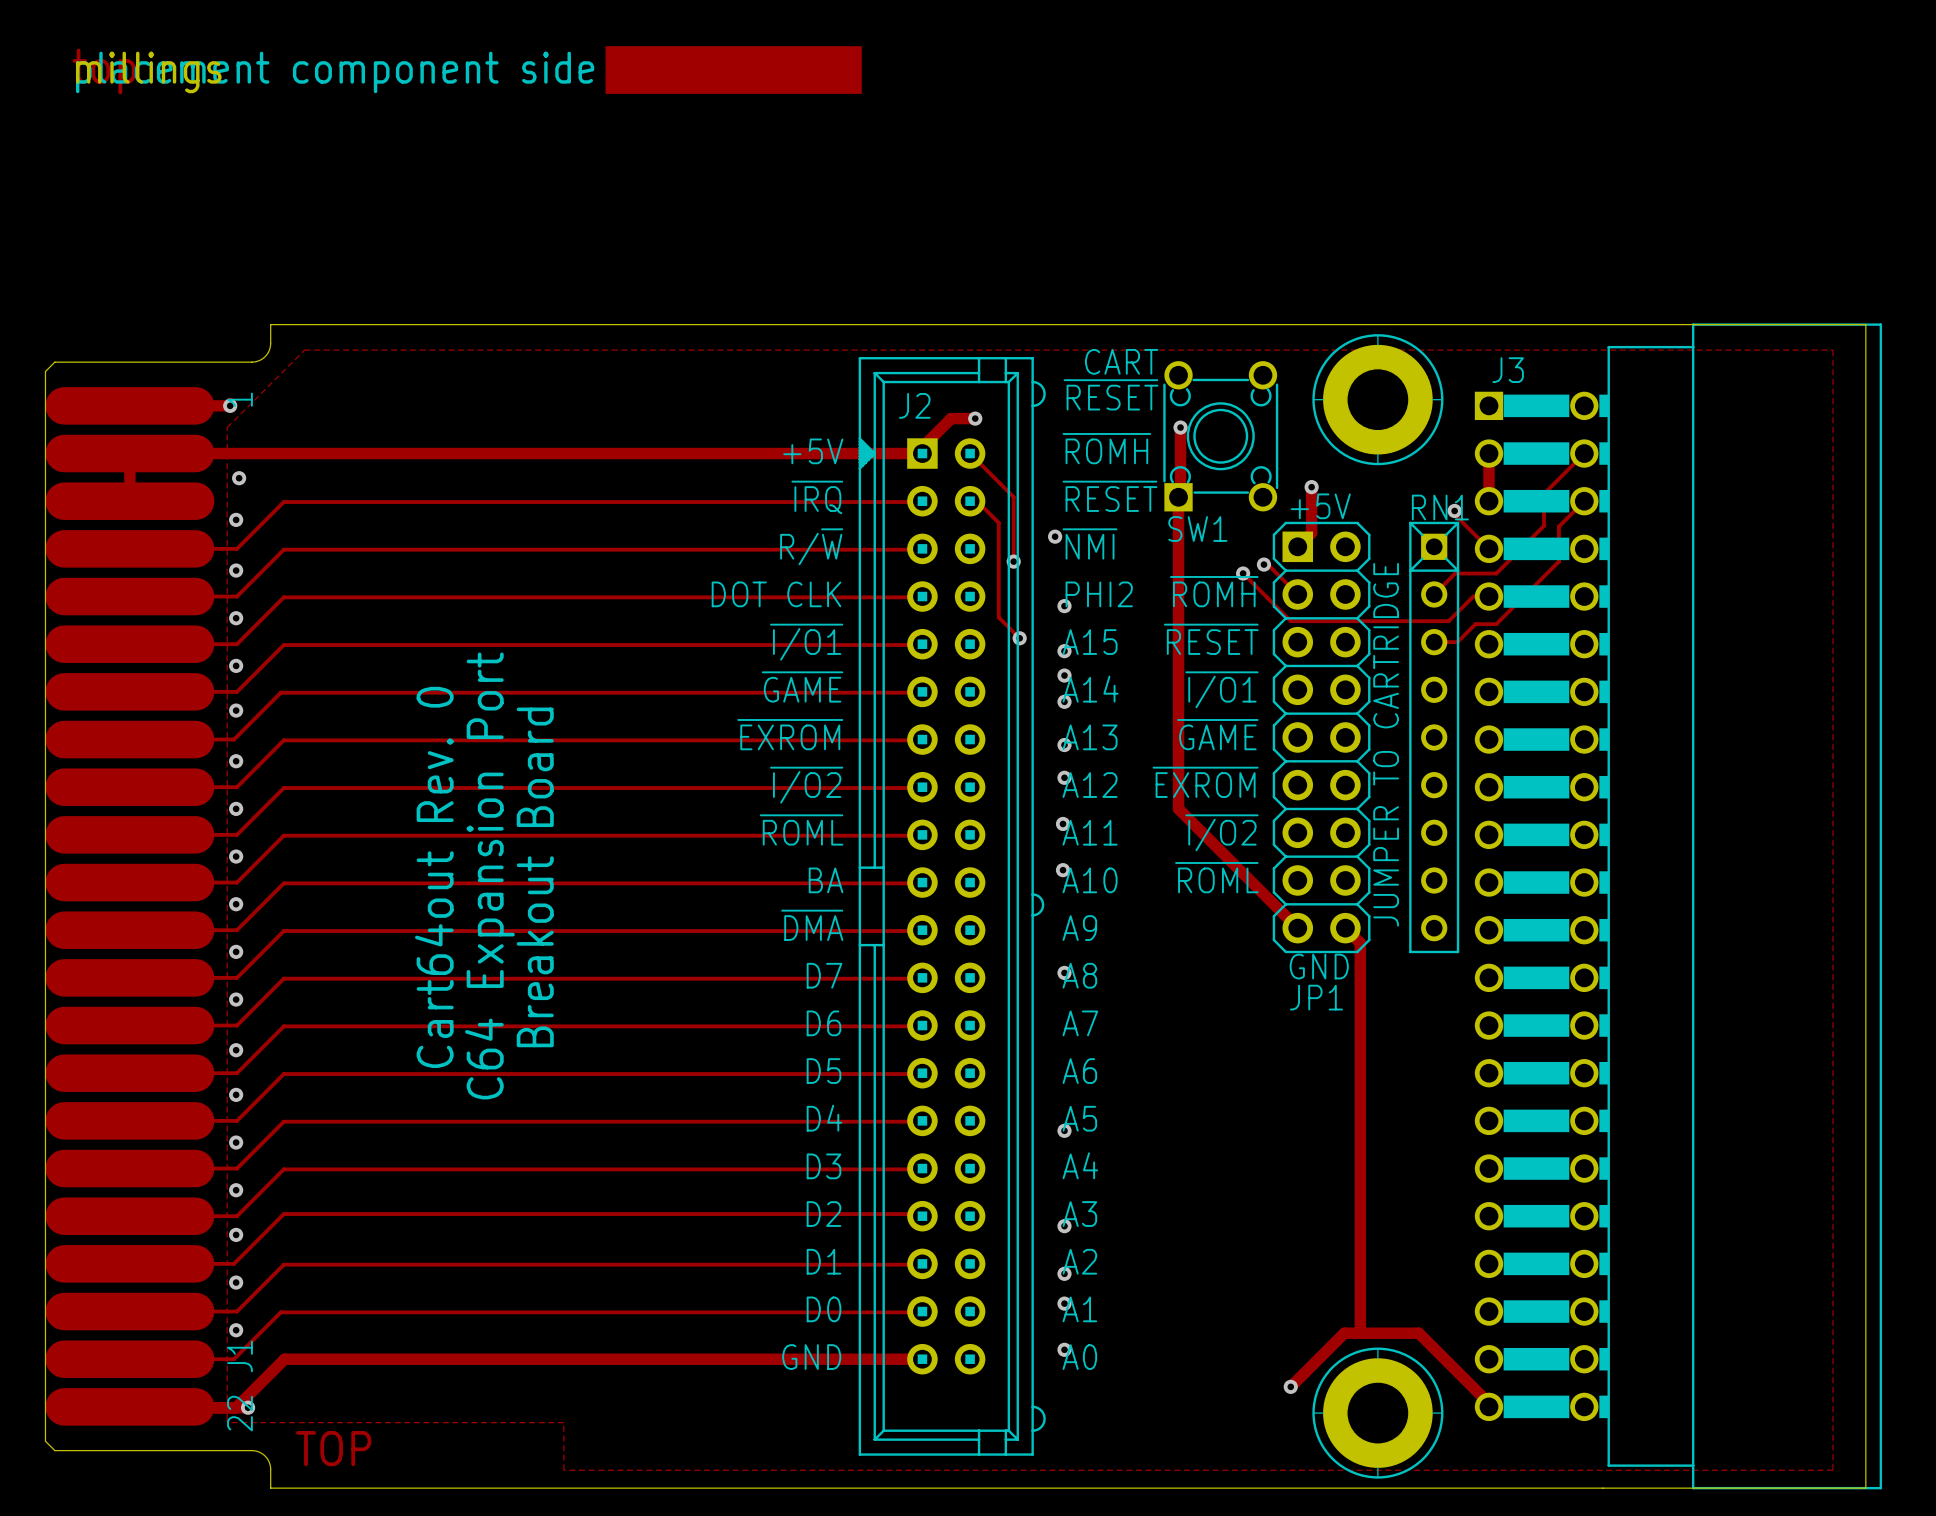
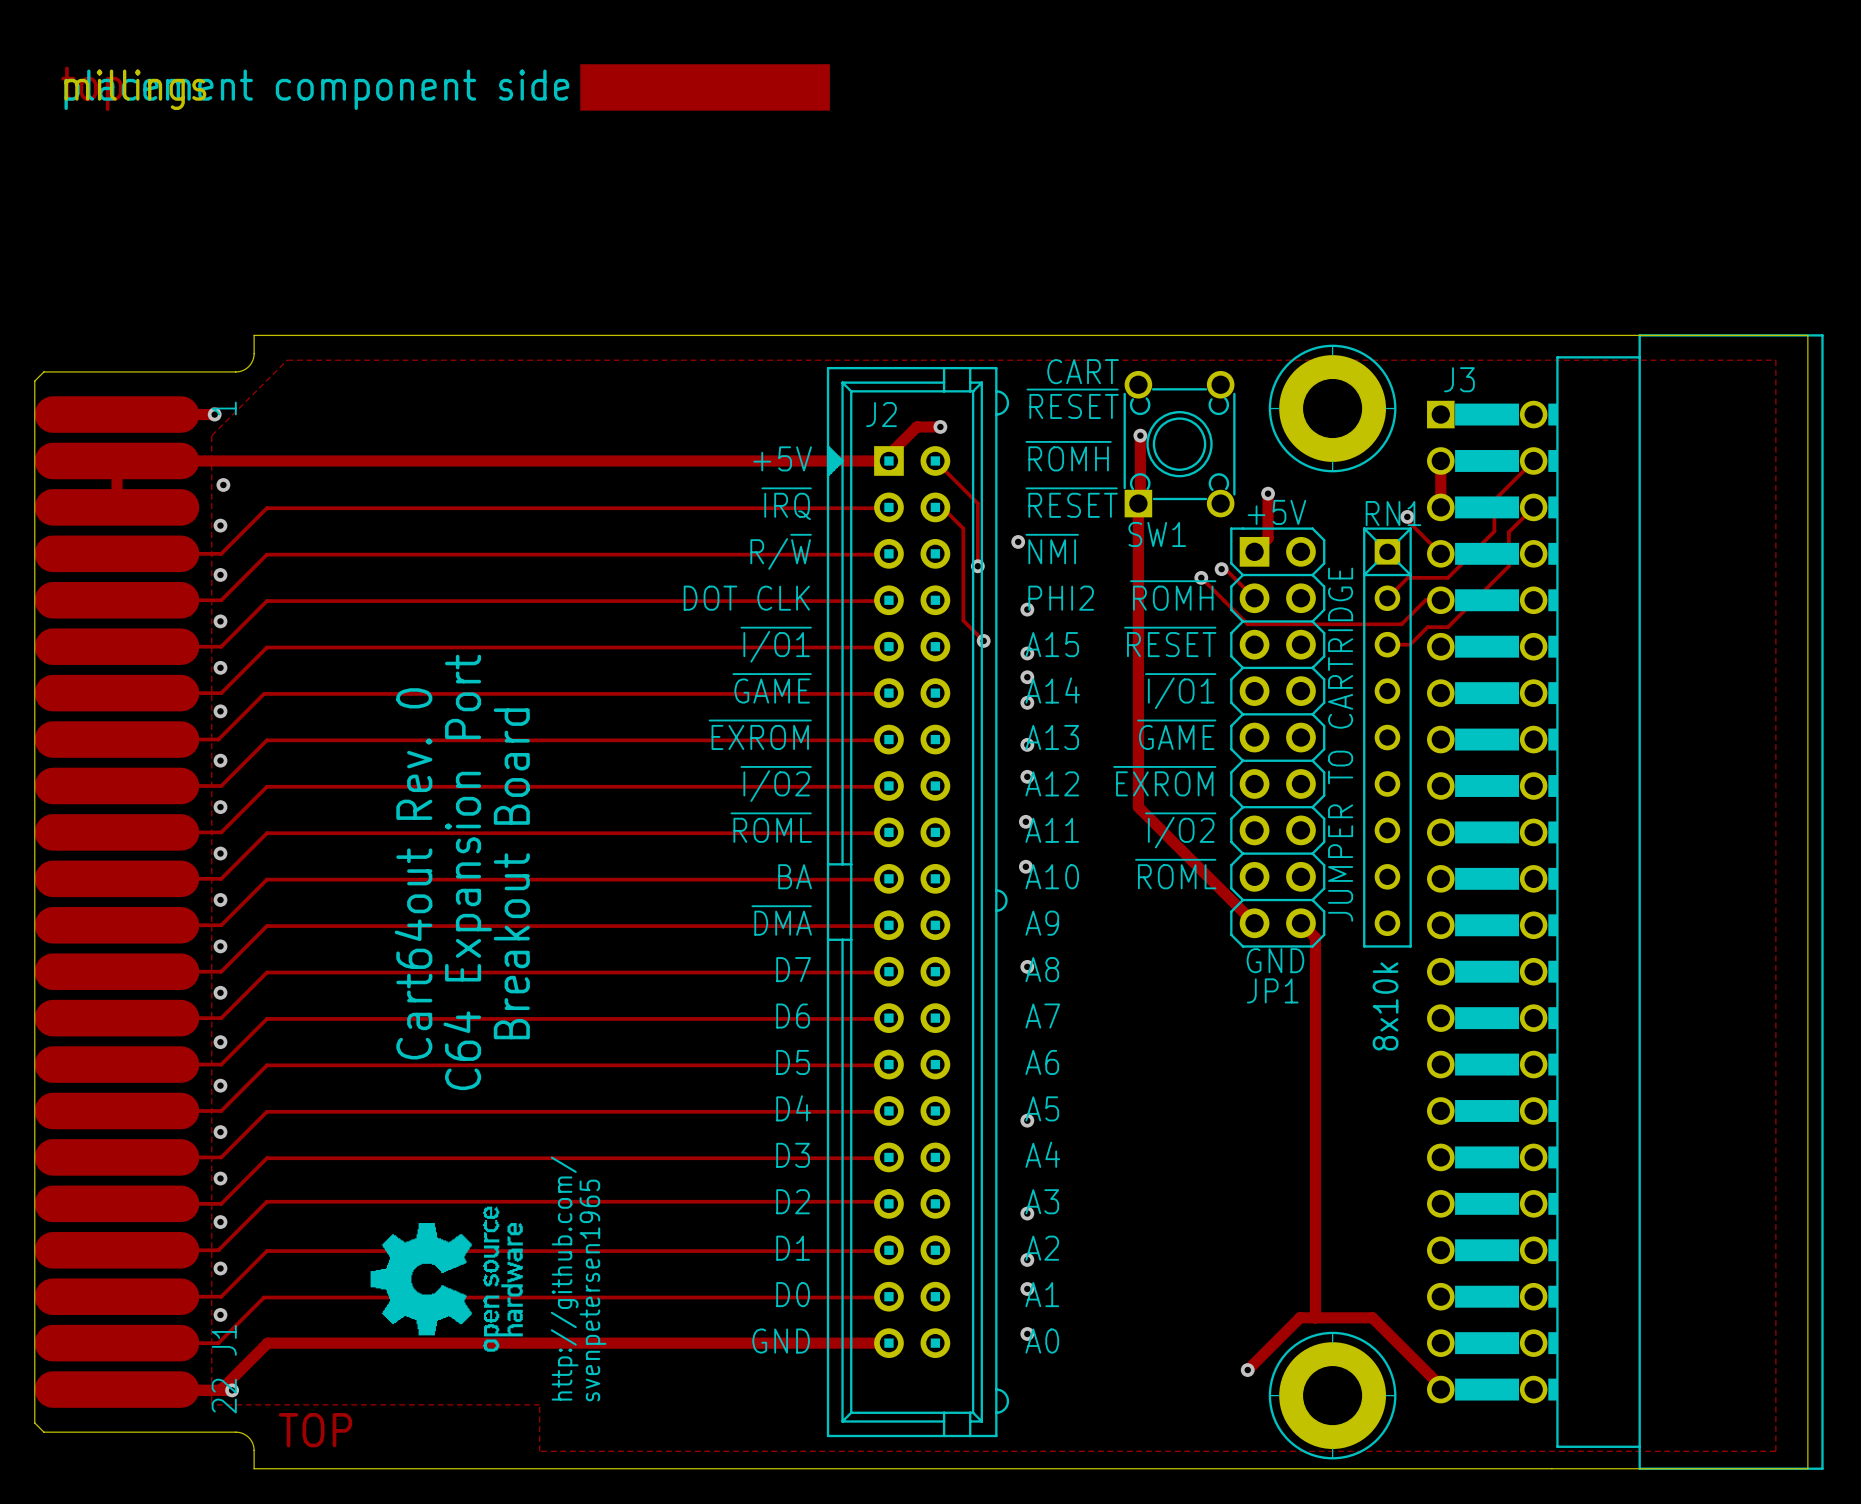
JP1 footprint: [1272, 521, 1371, 954] -> [1230, 527, 1326, 948]
text: none -> 8x10k (1385, 1006)
drawing: none -> [370, 1206, 523, 1352]
text: none -> http://github.com/ (564, 1278)
text: none -> svenpetersen1965 (592, 1290)

